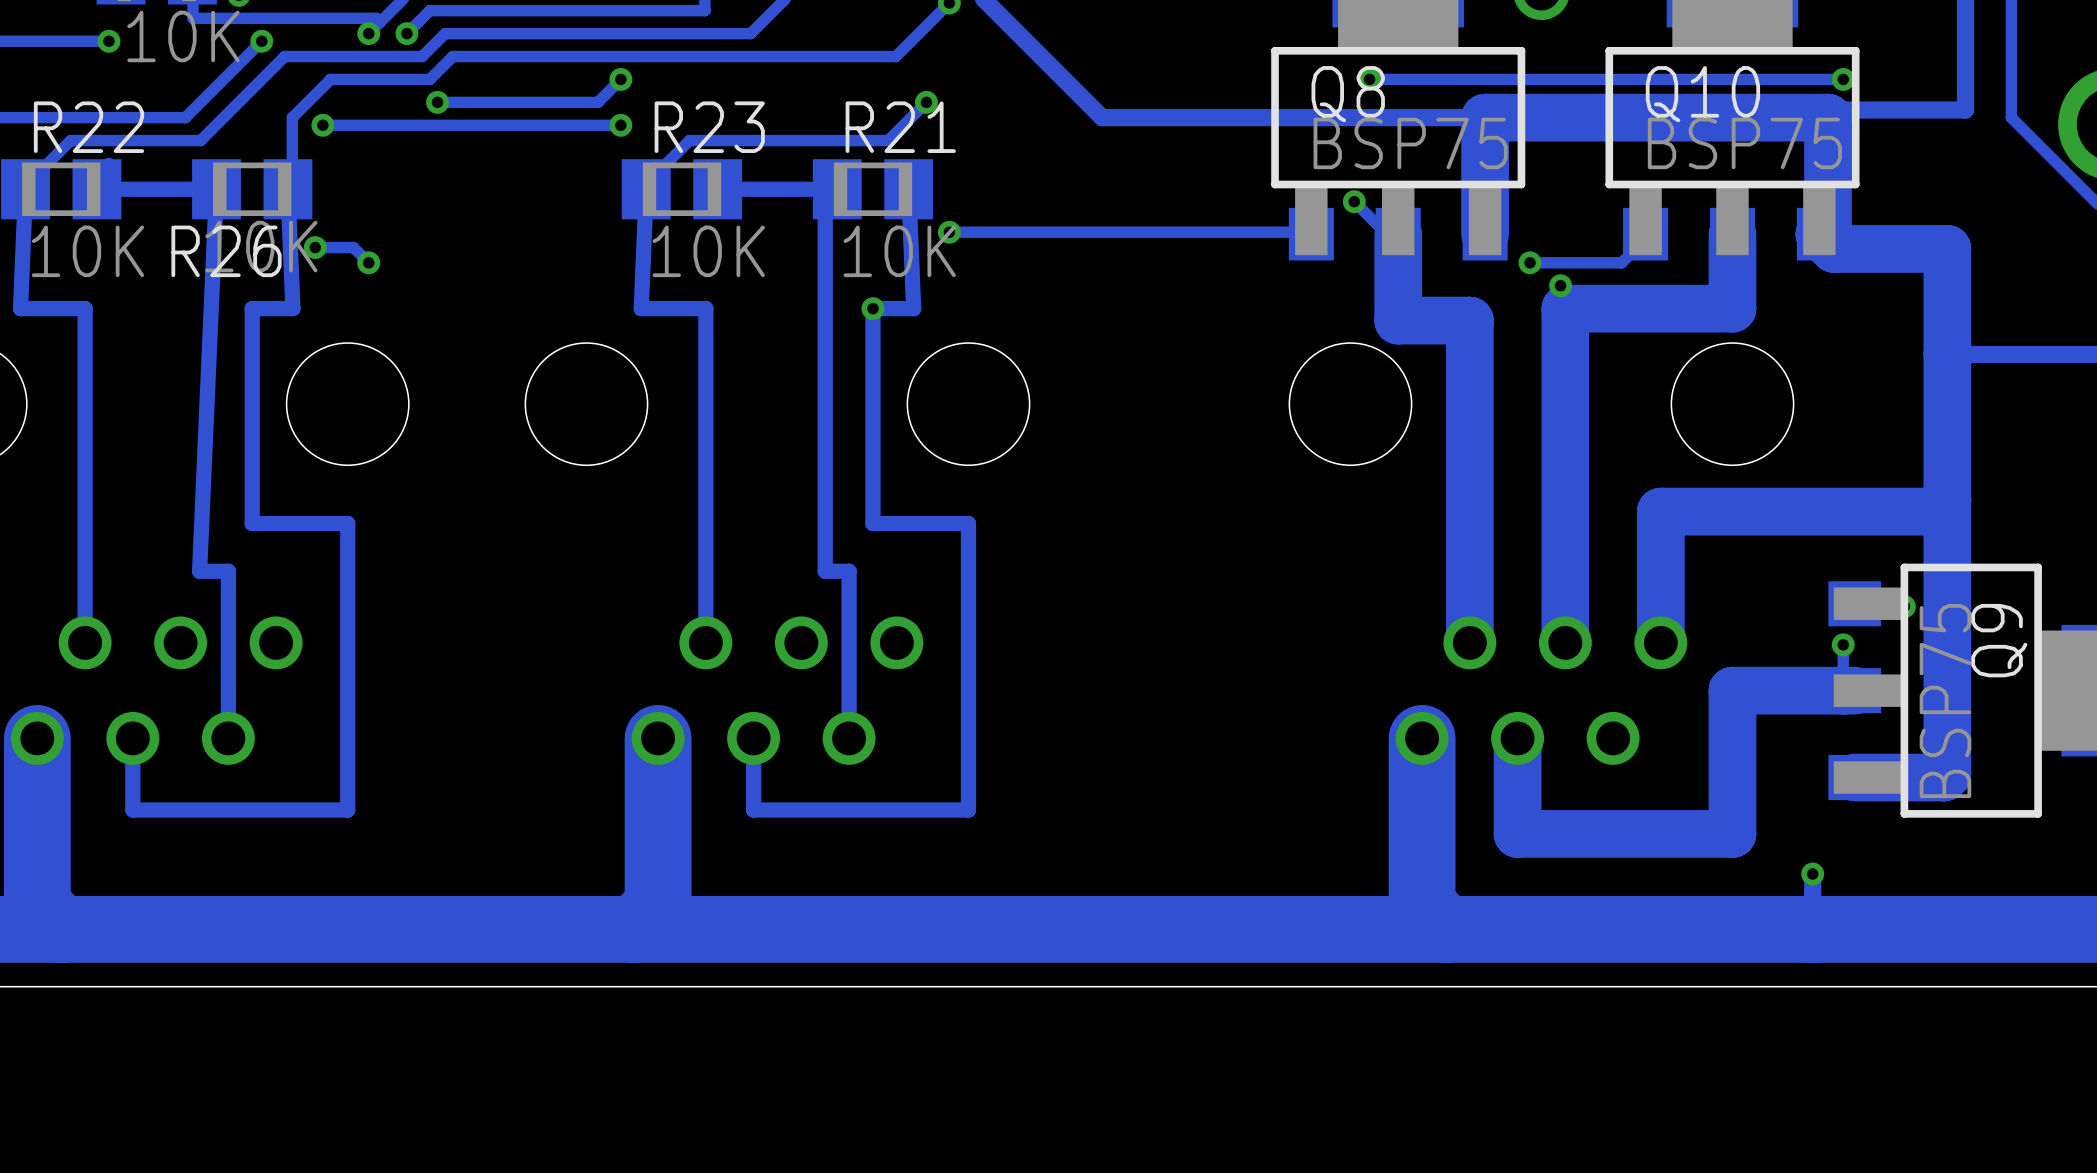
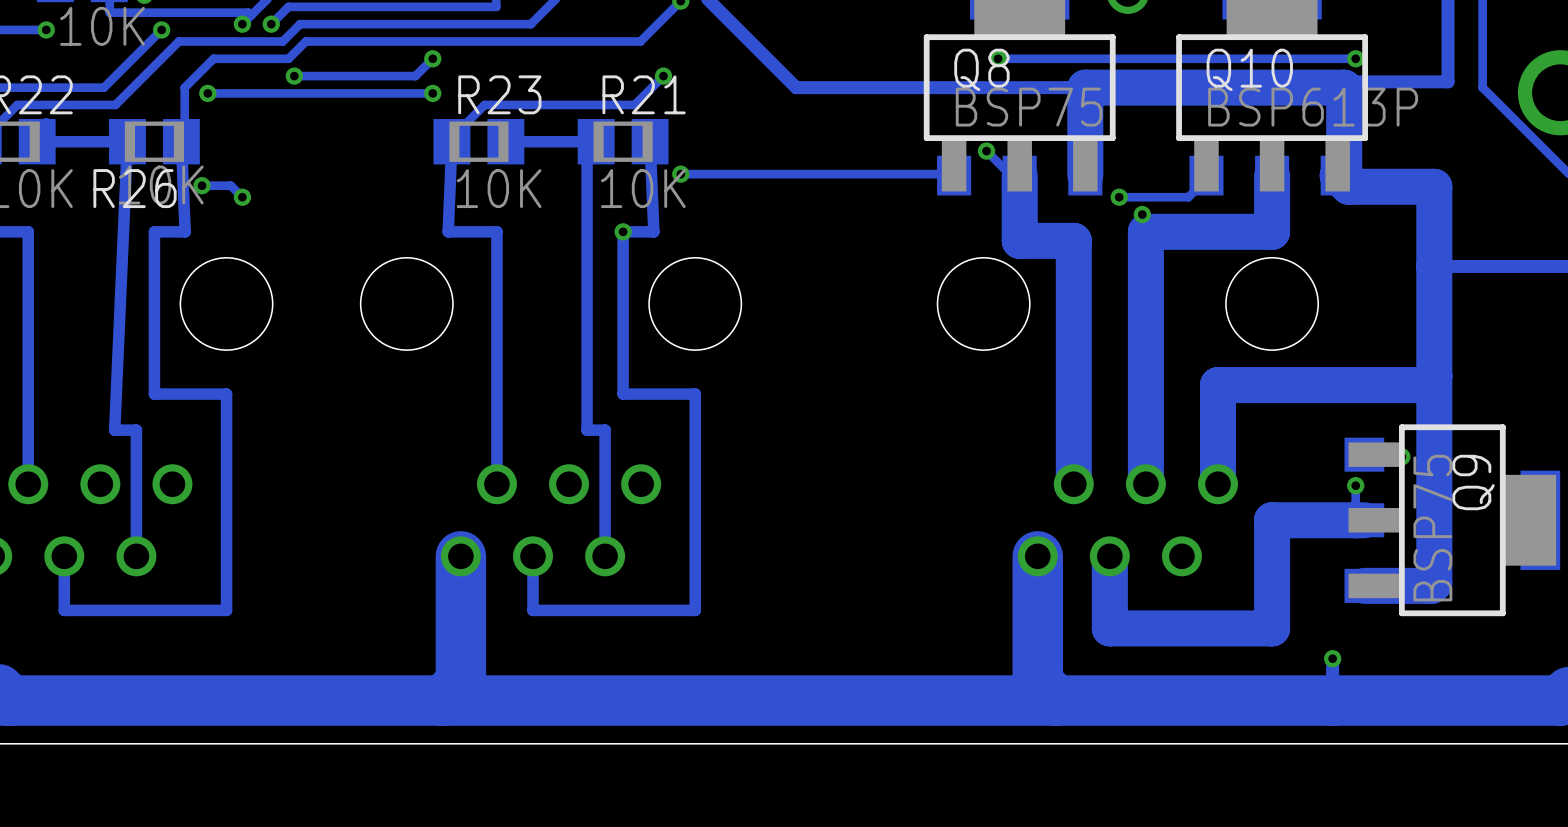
Q10 value: BSP75 (1744, 143) -> BSP613P (1313, 107)

